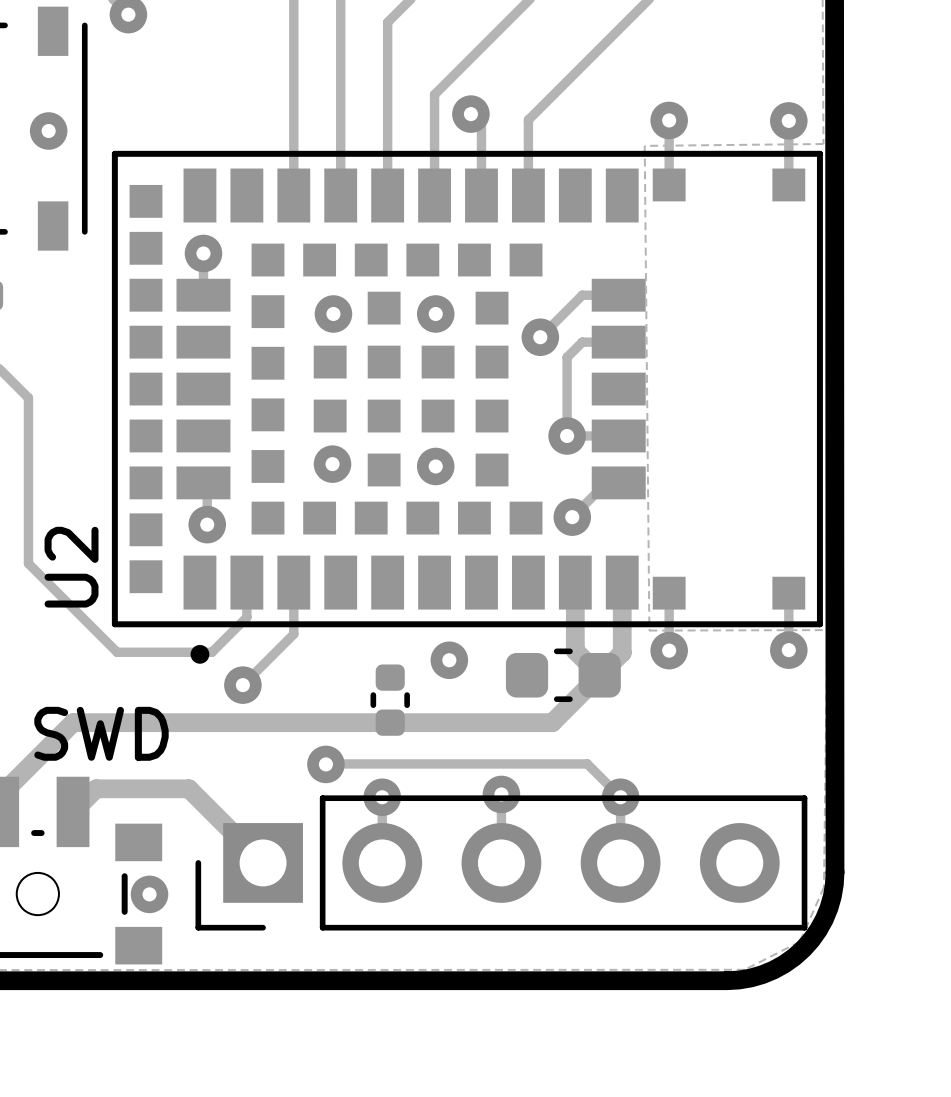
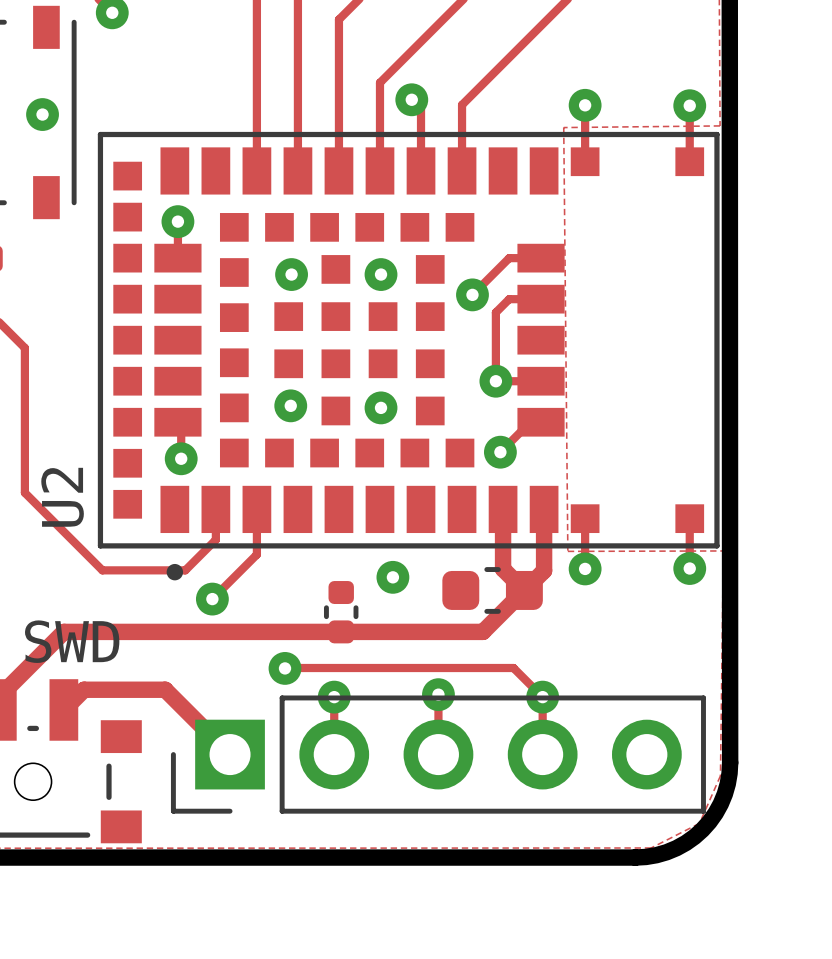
via: (149, 894) -> none

